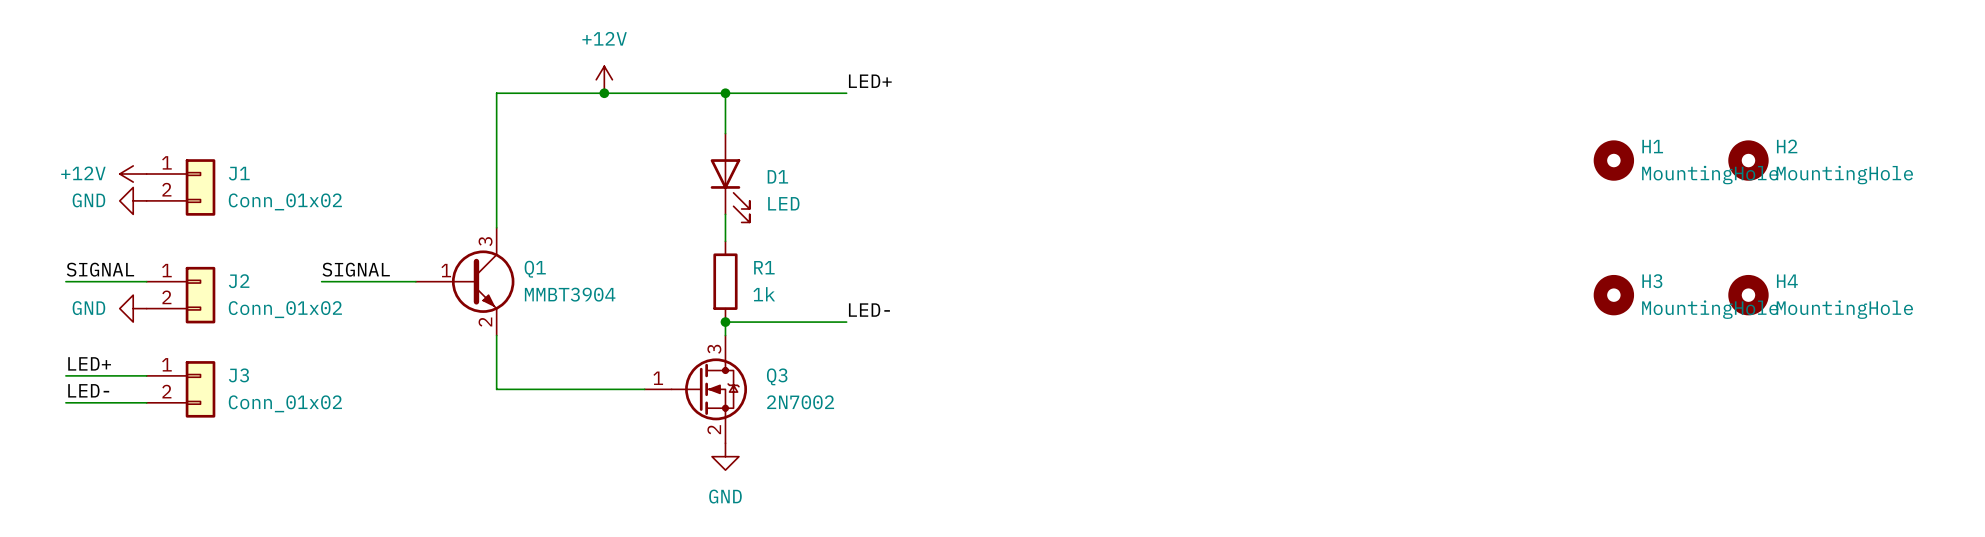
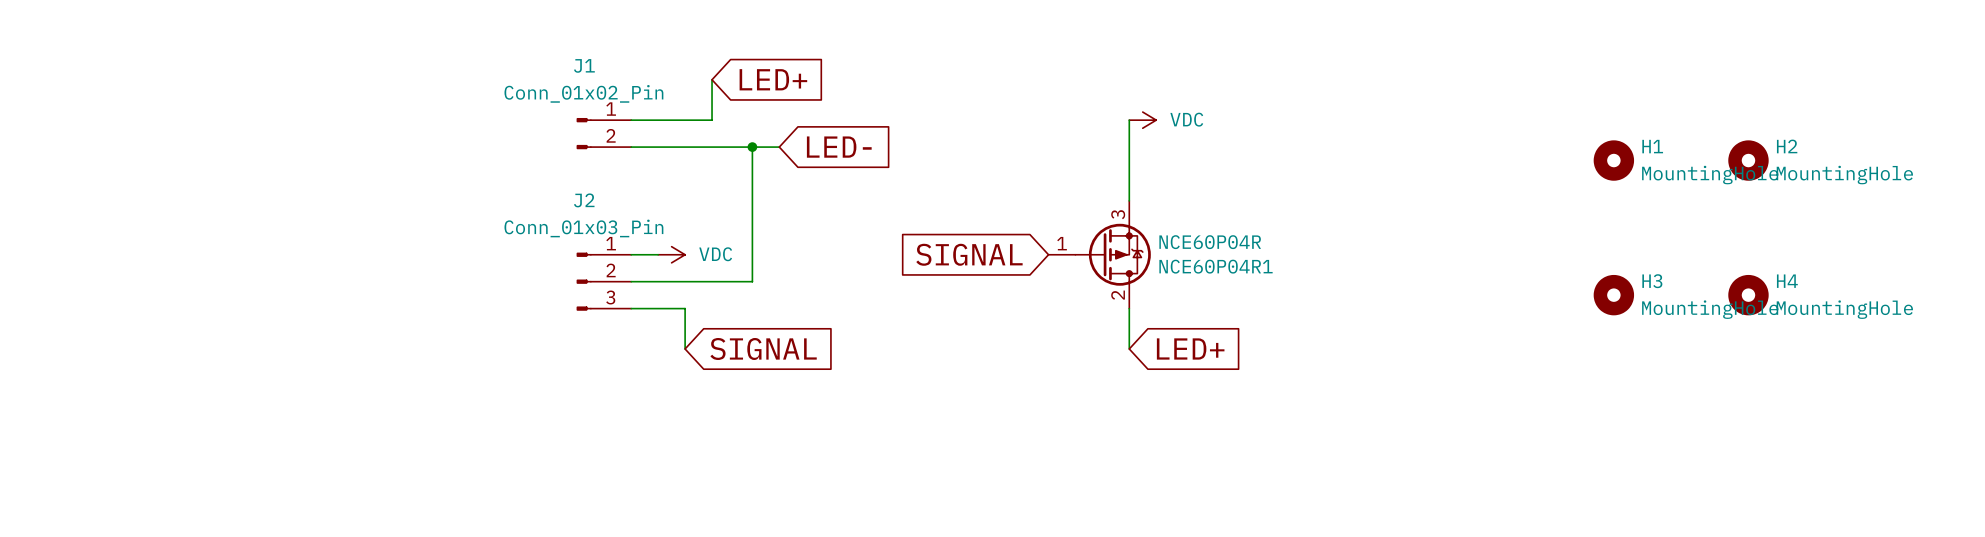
power symbol: +12V (604, 79) -> none
wire: none -> (712, 79) (712, 120) (631, 120)
global label: none -> LED+ (773, 79)
label: LED+ (870, 81) -> none
junction: (604, 93) -> none
wire: (725, 93) (725, 133) -> none
junction position: (725, 93) -> (752, 147)
wire: (846, 93) (496, 93) (496, 227) -> none
wire: none -> (1129, 120) (1129, 200)
power symbol: none -> VDC (1142, 120)
wire: none -> (631, 147) (779, 147)
wire: none -> (752, 147) (752, 281) (631, 281)
global label: none -> LED- (839, 147)
J1 symbol: [146, 159, 216, 216] -> [576, 118, 632, 150]
power symbol: +12V (133, 173) -> none
J1 name position: J1 (239, 173) -> J1 (584, 65)
D1: LED (730, 178) -> none
power symbol: GND (133, 200) -> none
J1 value: Conn_01x02 (285, 201) -> Conn_01x02_Pin (583, 93)
wire: (725, 214) (725, 241) -> none
wire: none -> (631, 254) (658, 254)
power symbol: none -> VDC (671, 254)
global label: none -> SIGNAL (969, 254)
NCE60P04R1: none -> NCE60P04R (1099, 254)
J2 symbol: [146, 266, 216, 324] -> [576, 252, 632, 311]
label: SIGNAL (100, 269) -> none
label: SIGNAL (356, 269) -> none
wire: (65, 281) (146, 281) -> none
J2 name position: J2 (239, 281) -> J2 (584, 200)
wire: (321, 281) (415, 281) -> none
Q1: MMBT3904 (465, 281) -> none
R1: 1k (725, 281) -> none
power symbol: GND (133, 308) -> none
wire: none -> (631, 308) (685, 308) (685, 348)
wire: none -> (1129, 308) (1129, 348)
J2 value: Conn_01x02 (285, 309) -> Conn_01x03_Pin (583, 228)
label: LED- (869, 310) -> none
junction: (725, 322) -> none
wire: (846, 322) (725, 322) (725, 335) -> none
wire: (496, 335) (496, 389) (644, 389) -> none
global label: none -> SIGNAL (763, 348)
global label: none -> LED+ (1190, 348)
label: LED+ (89, 363) -> none
wire: (65, 375) (146, 375) -> none
J3: Conn_01x02 (181, 389) -> none
Q3: 2N7002 (695, 389) -> none
label: LED- (88, 390) -> none
wire: (65, 402) (146, 402) -> none
power symbol: GND (725, 456) -> none

